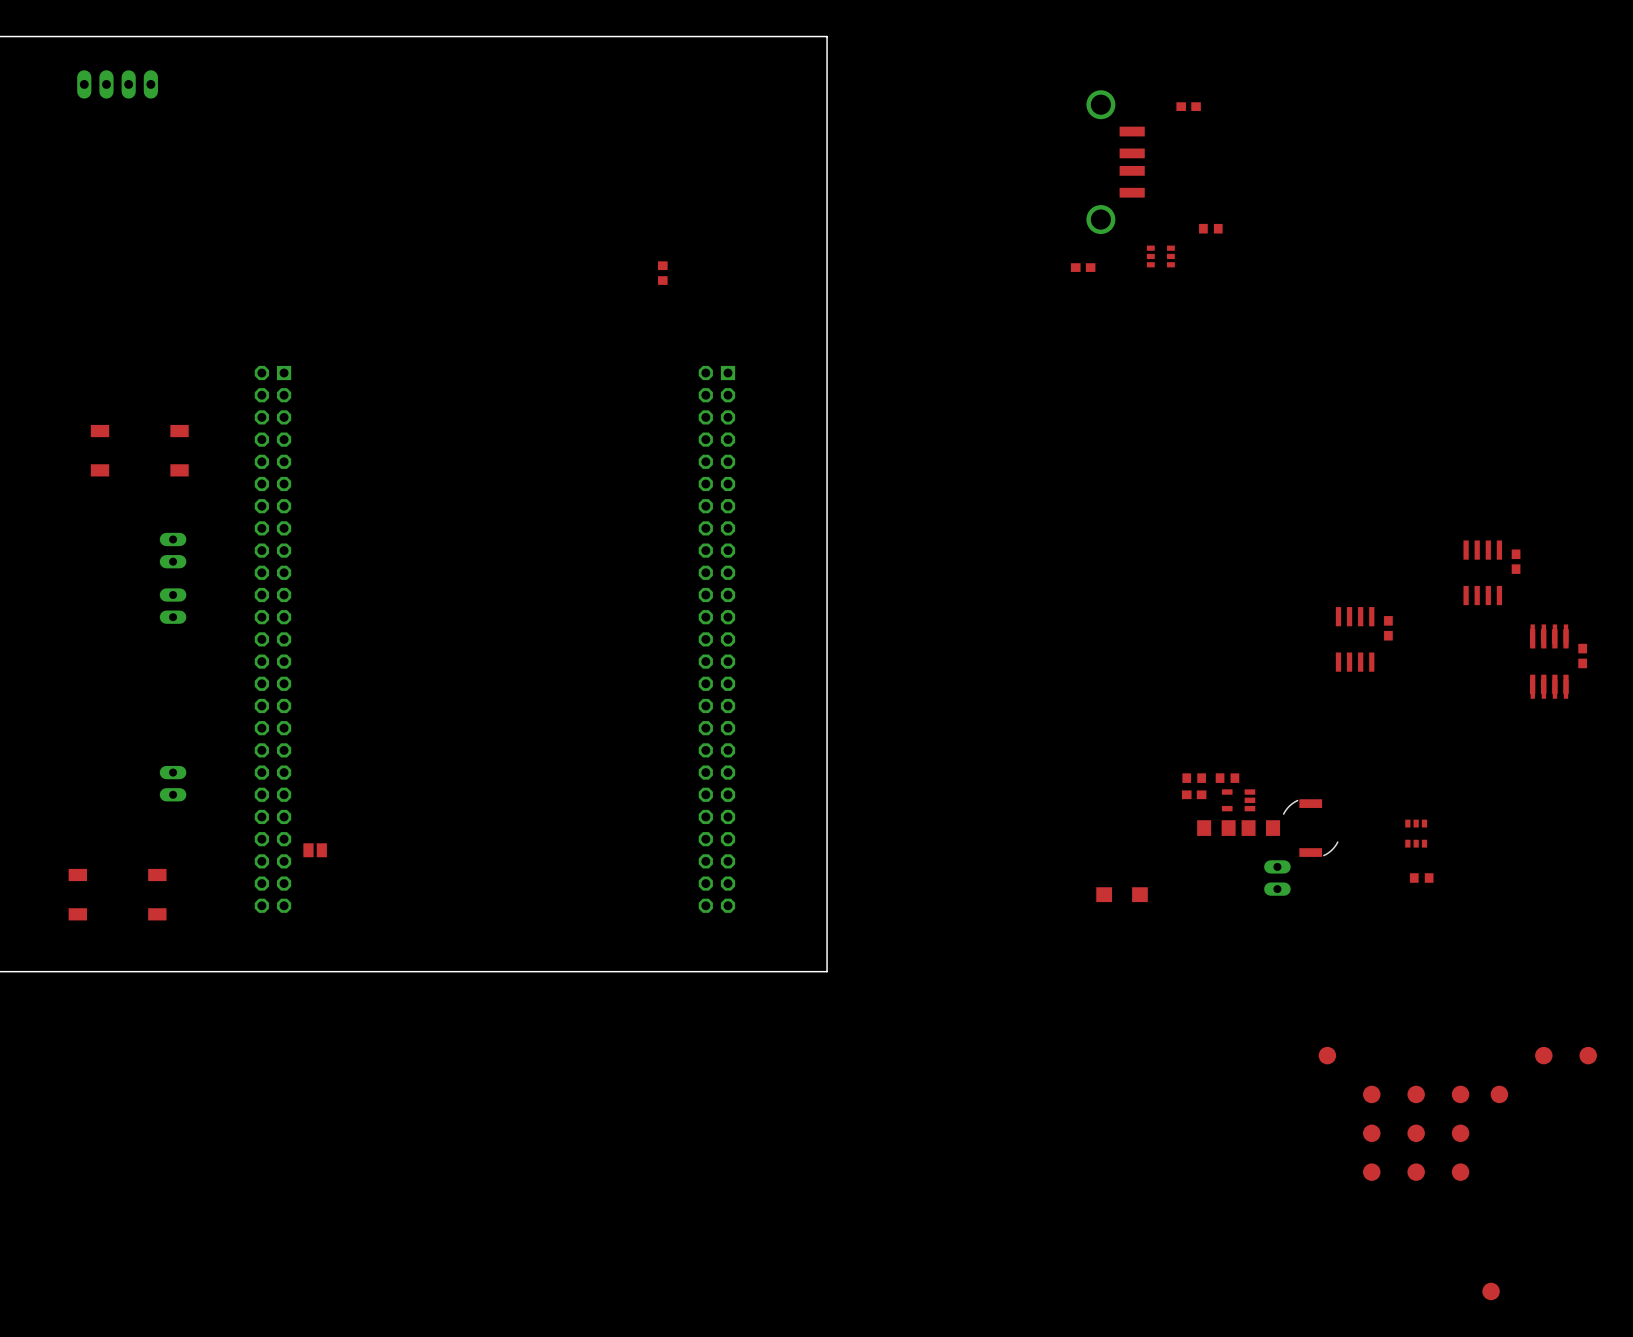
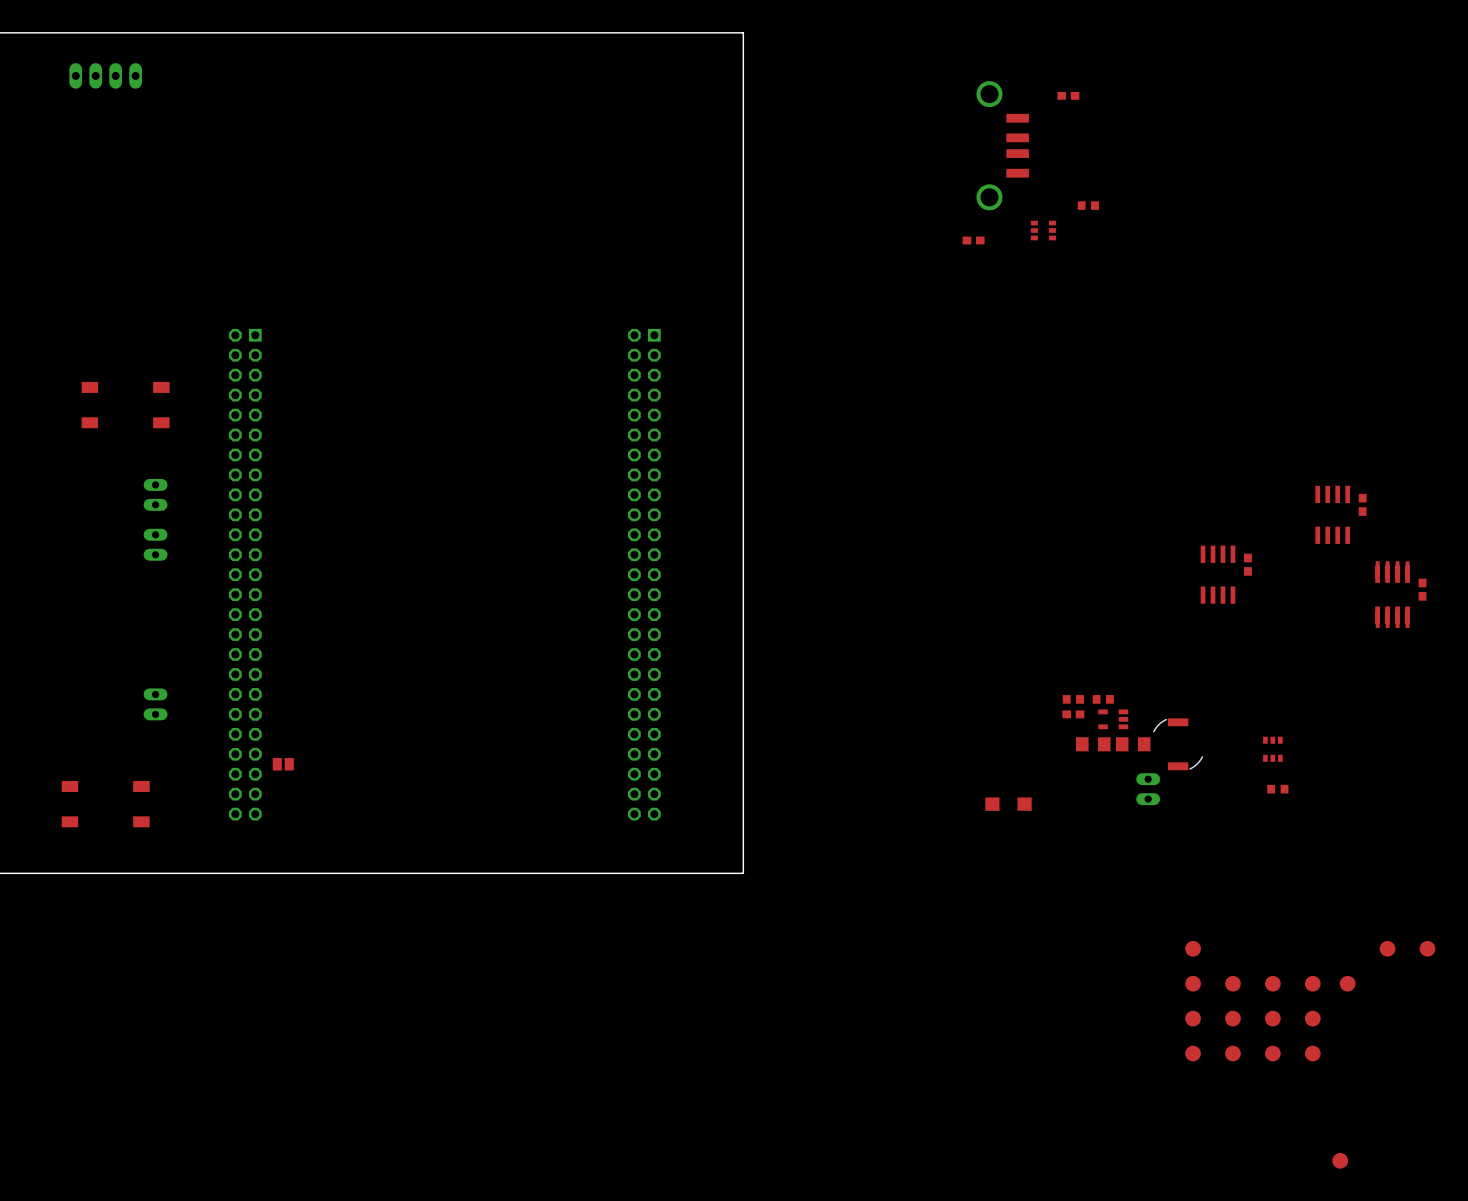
part: (662, 273) -> none
part: none -> (1193, 983)
part: none -> (1193, 1018)
part: none -> (1193, 1053)

